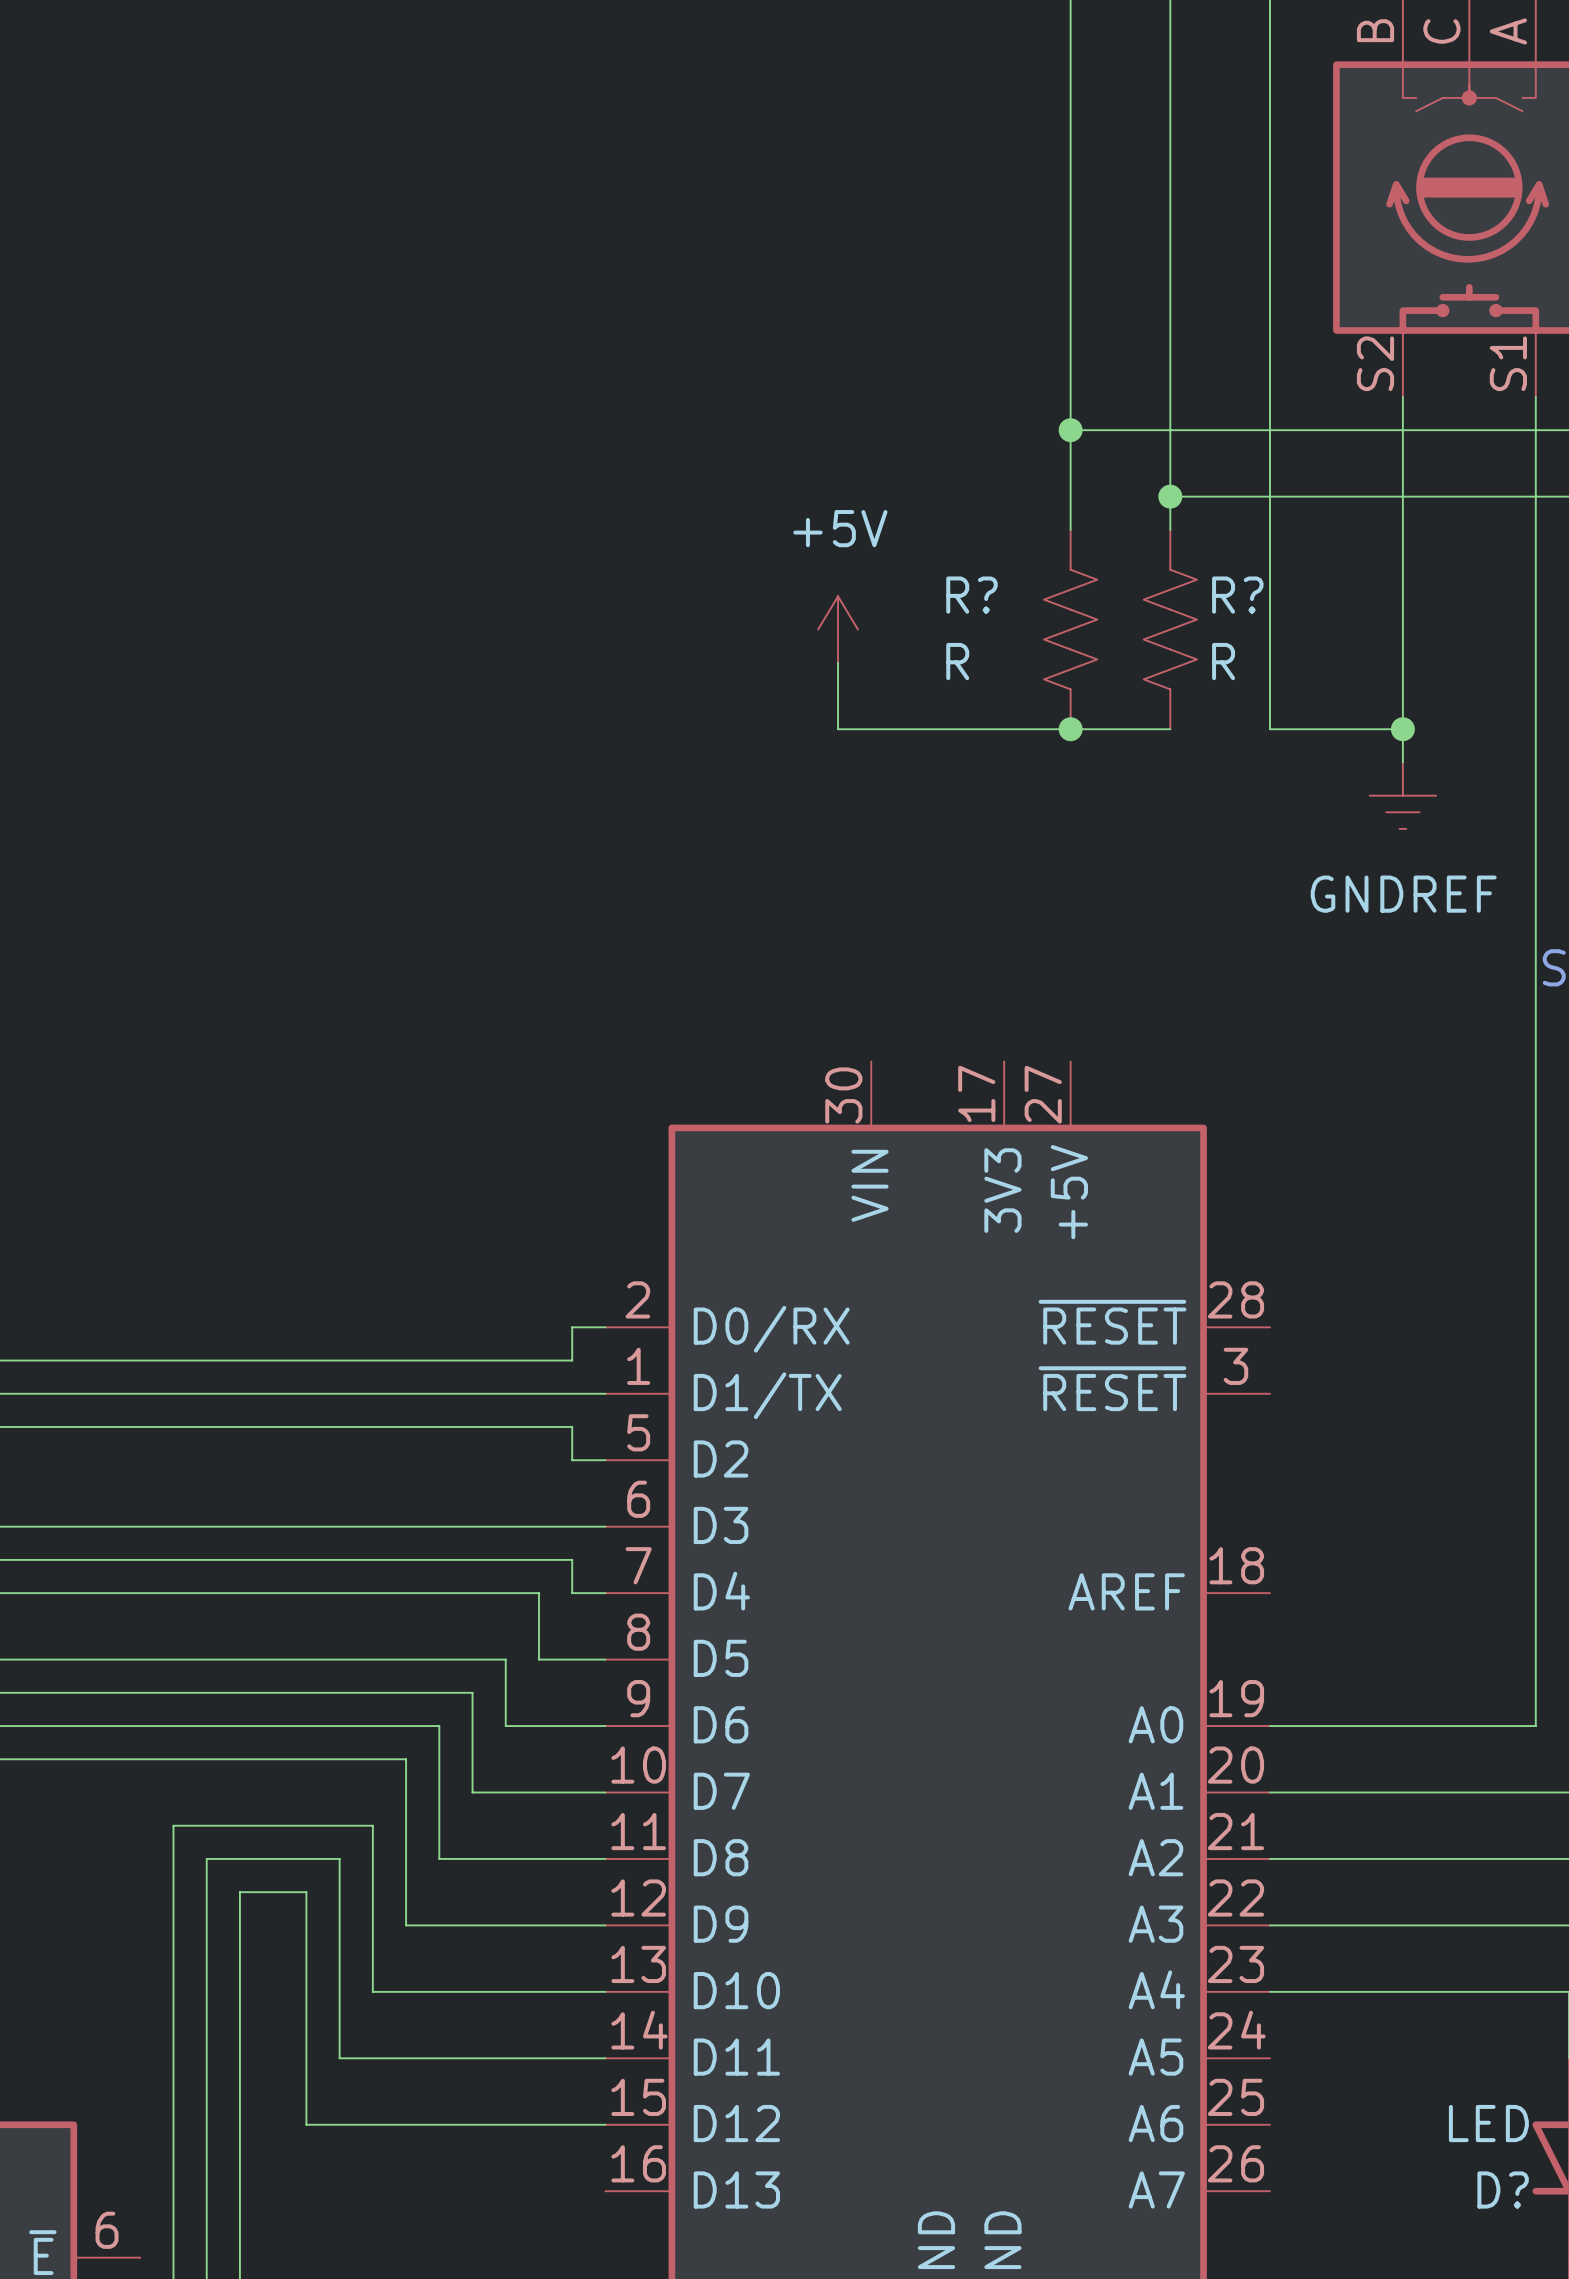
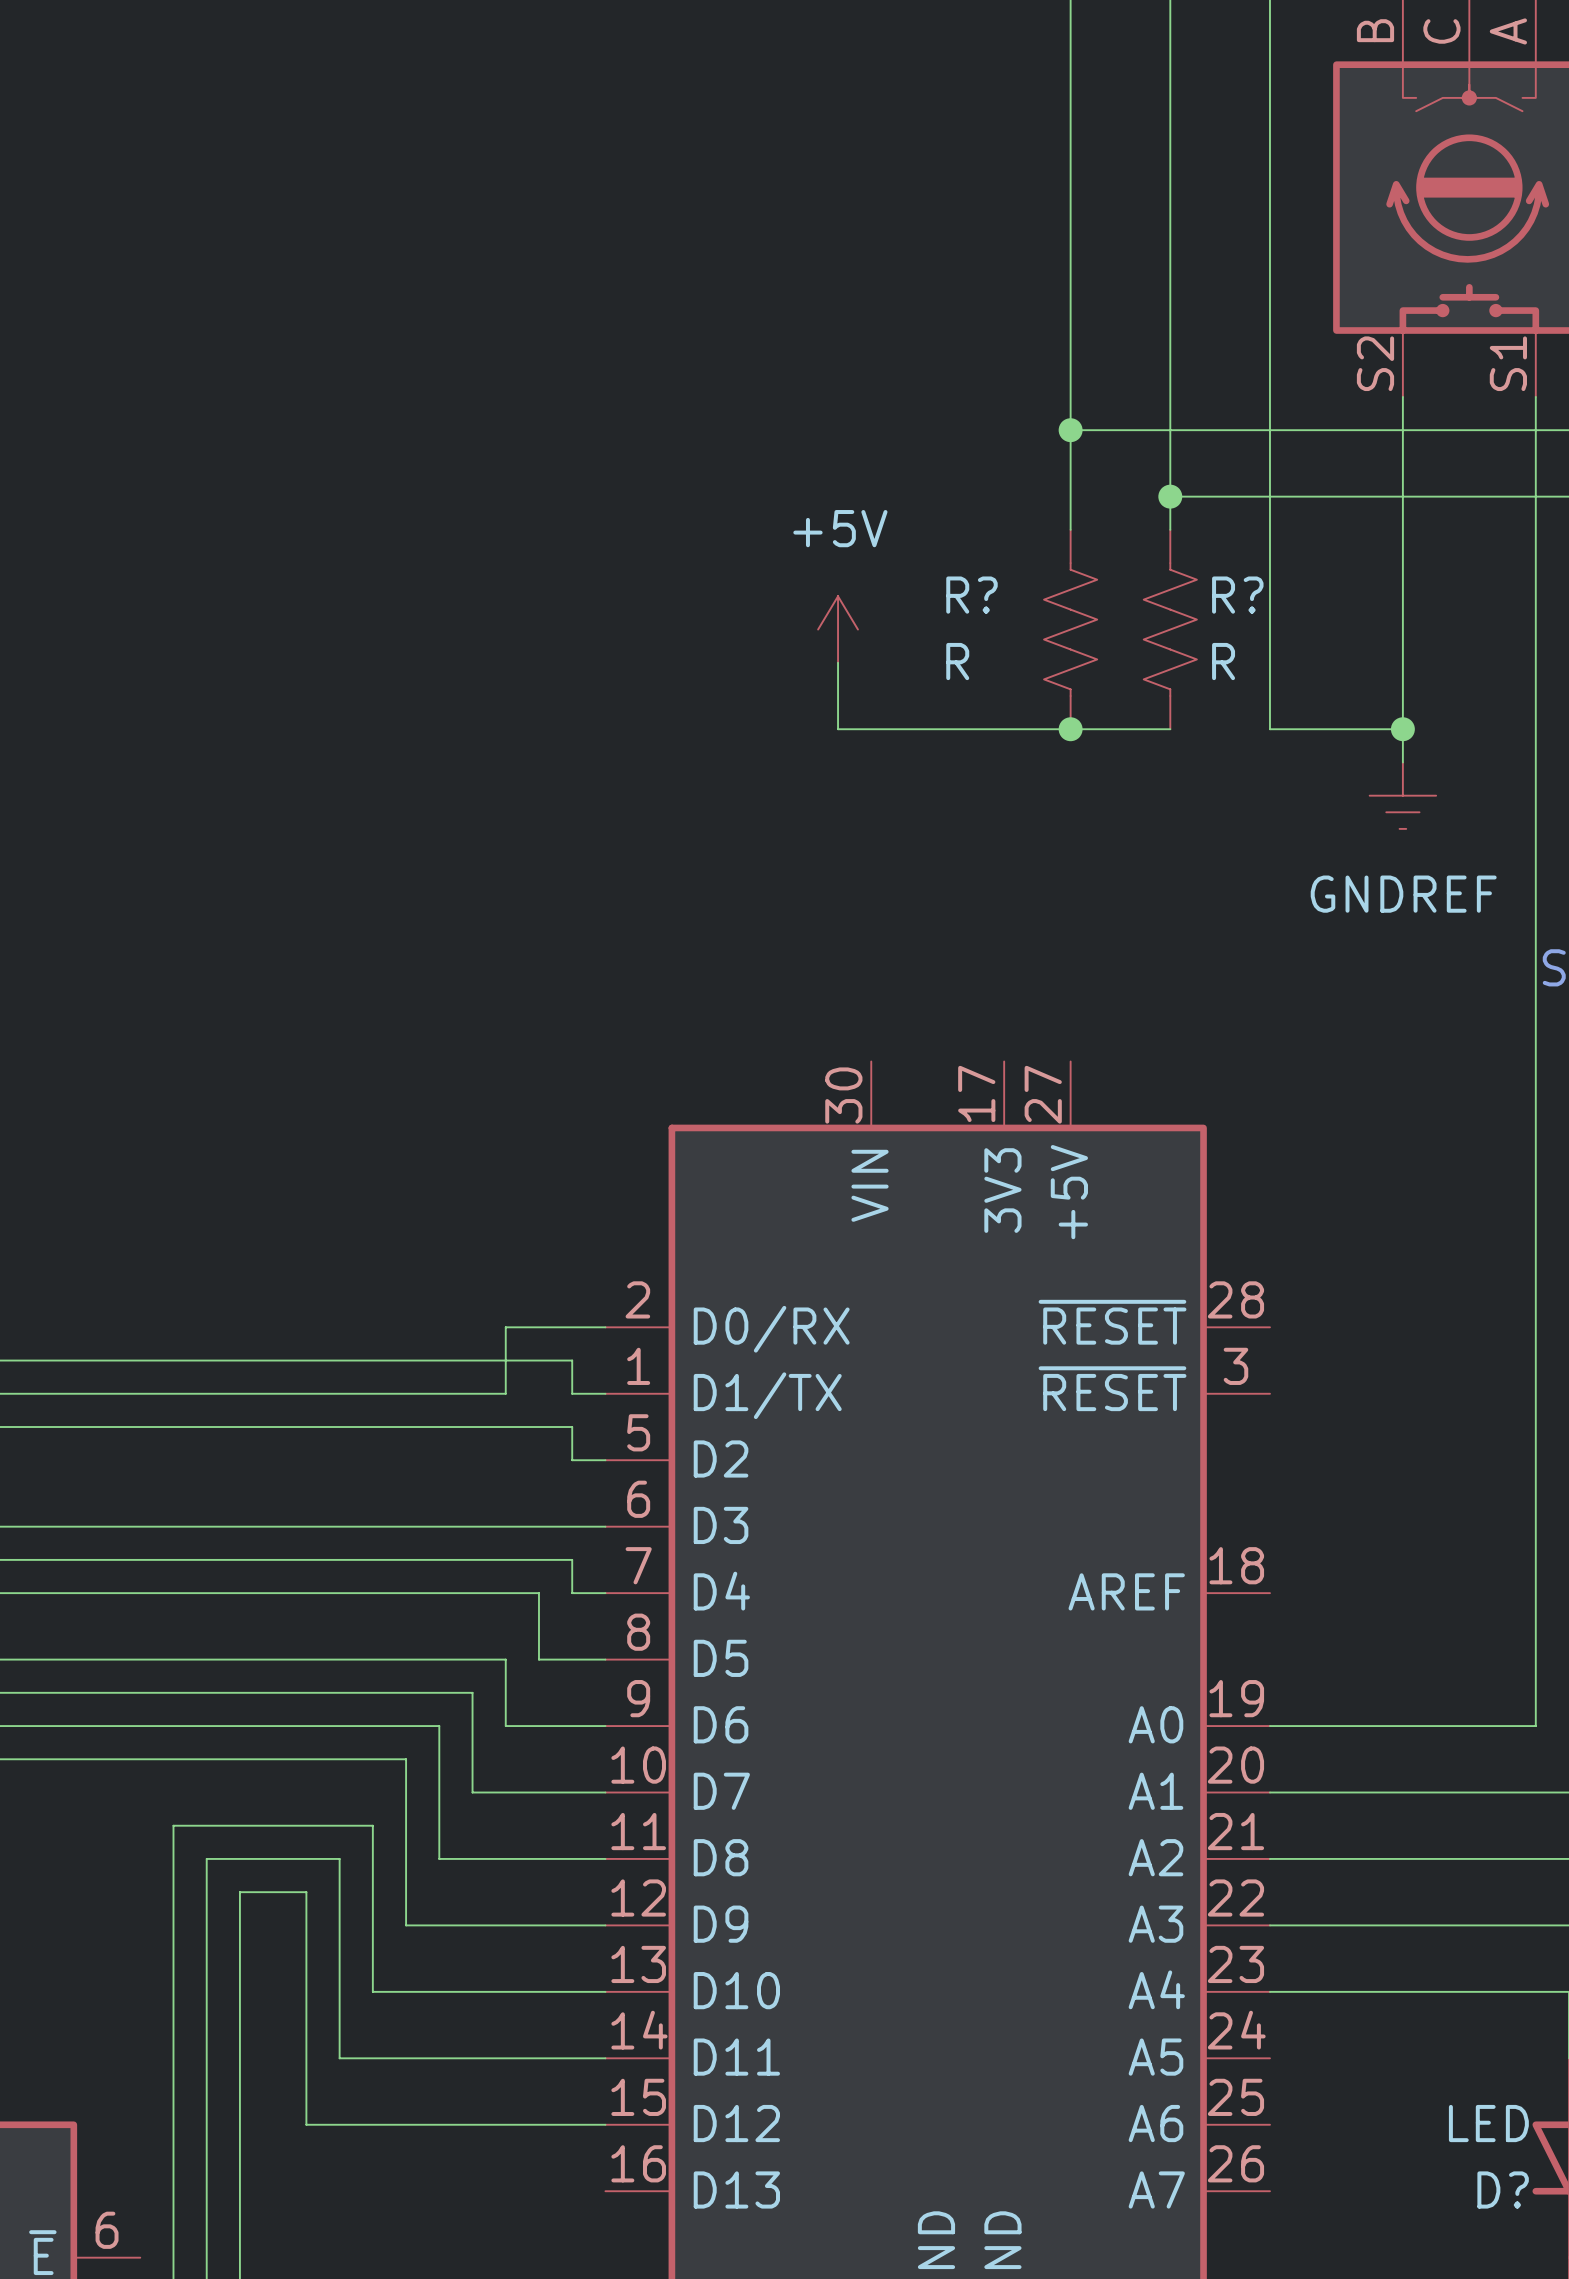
wire: (572, 1327) (572, 1360) -> (572, 1393) (572, 1360)
wire: (505, 1393) (572, 1393) -> (505, 1393) (505, 1327) (572, 1327)

